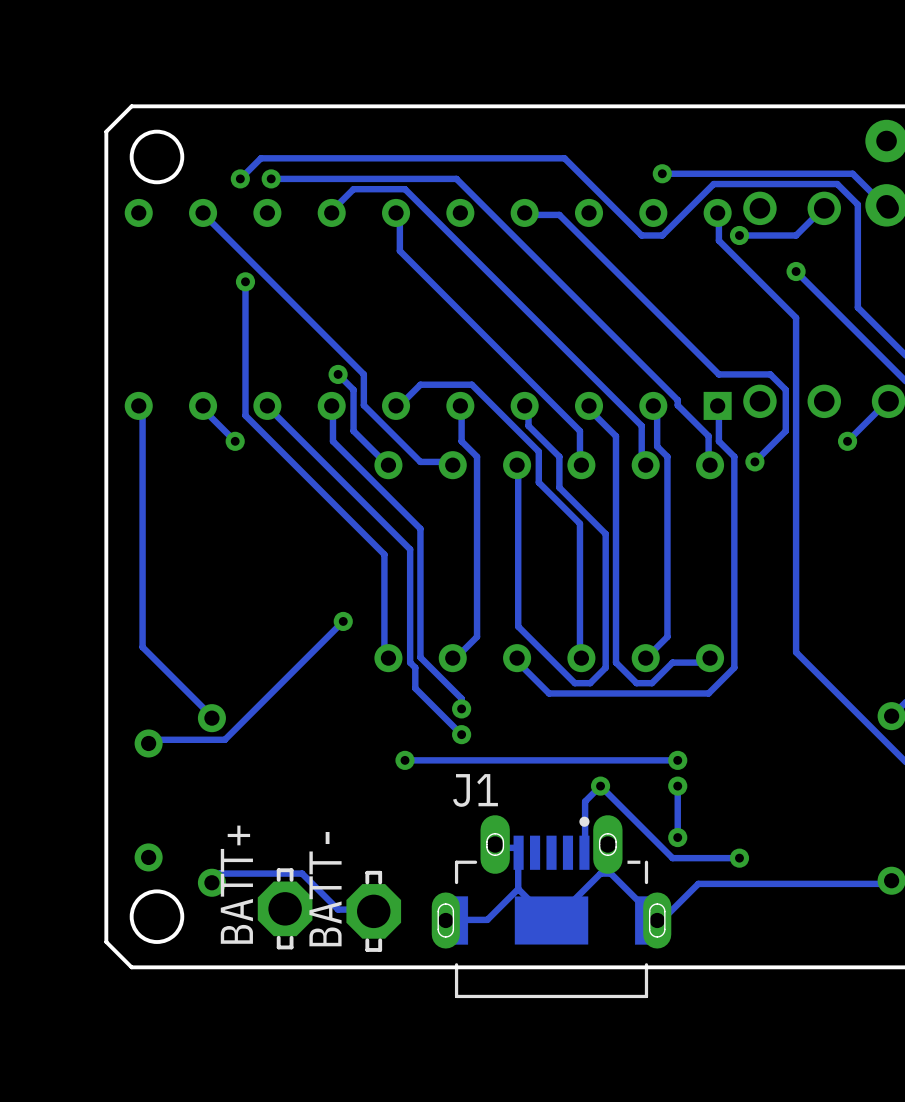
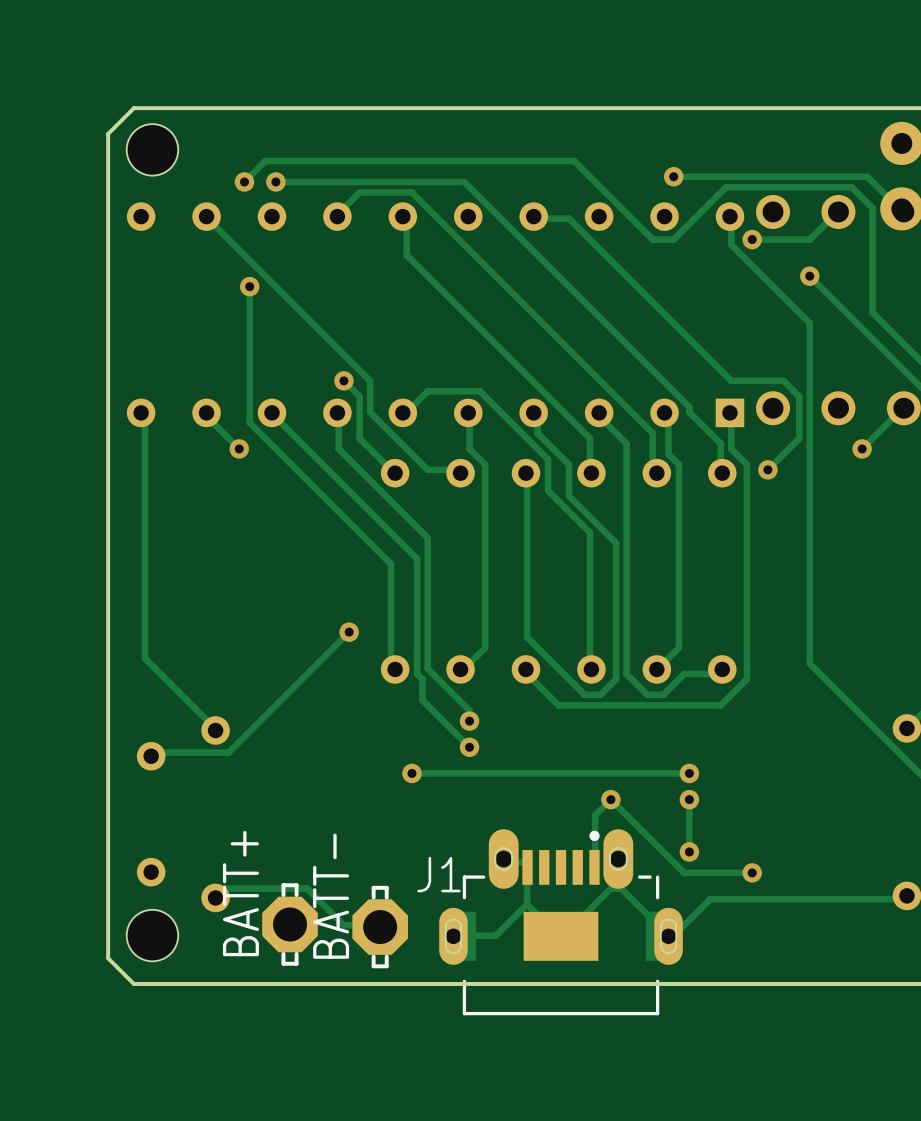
round board edge: [129, 129, 185, 185] -> none
hole: none -> (152, 149)
J1 name position: J1 (475, 790) -> J1 (438, 874)
round board edge: [129, 889, 185, 944] -> none
hole: none -> (152, 935)

